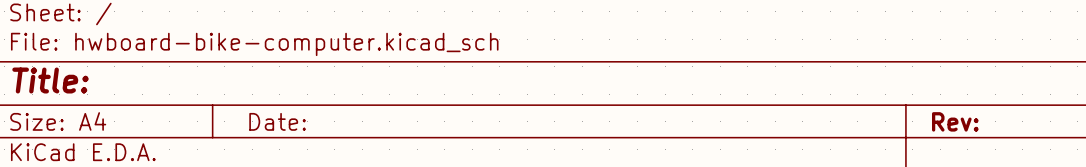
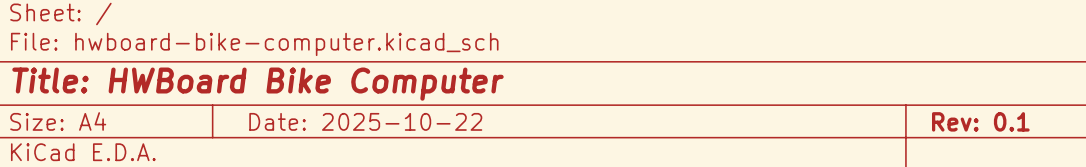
title block: Title: (50, 80) -> Title: HWBoard Bike Computer (257, 84)
title block: Date: (277, 121) -> Date: 2025-10-22 (365, 121)
title block: Rev: (955, 121) -> Rev: 0.1 (980, 121)

